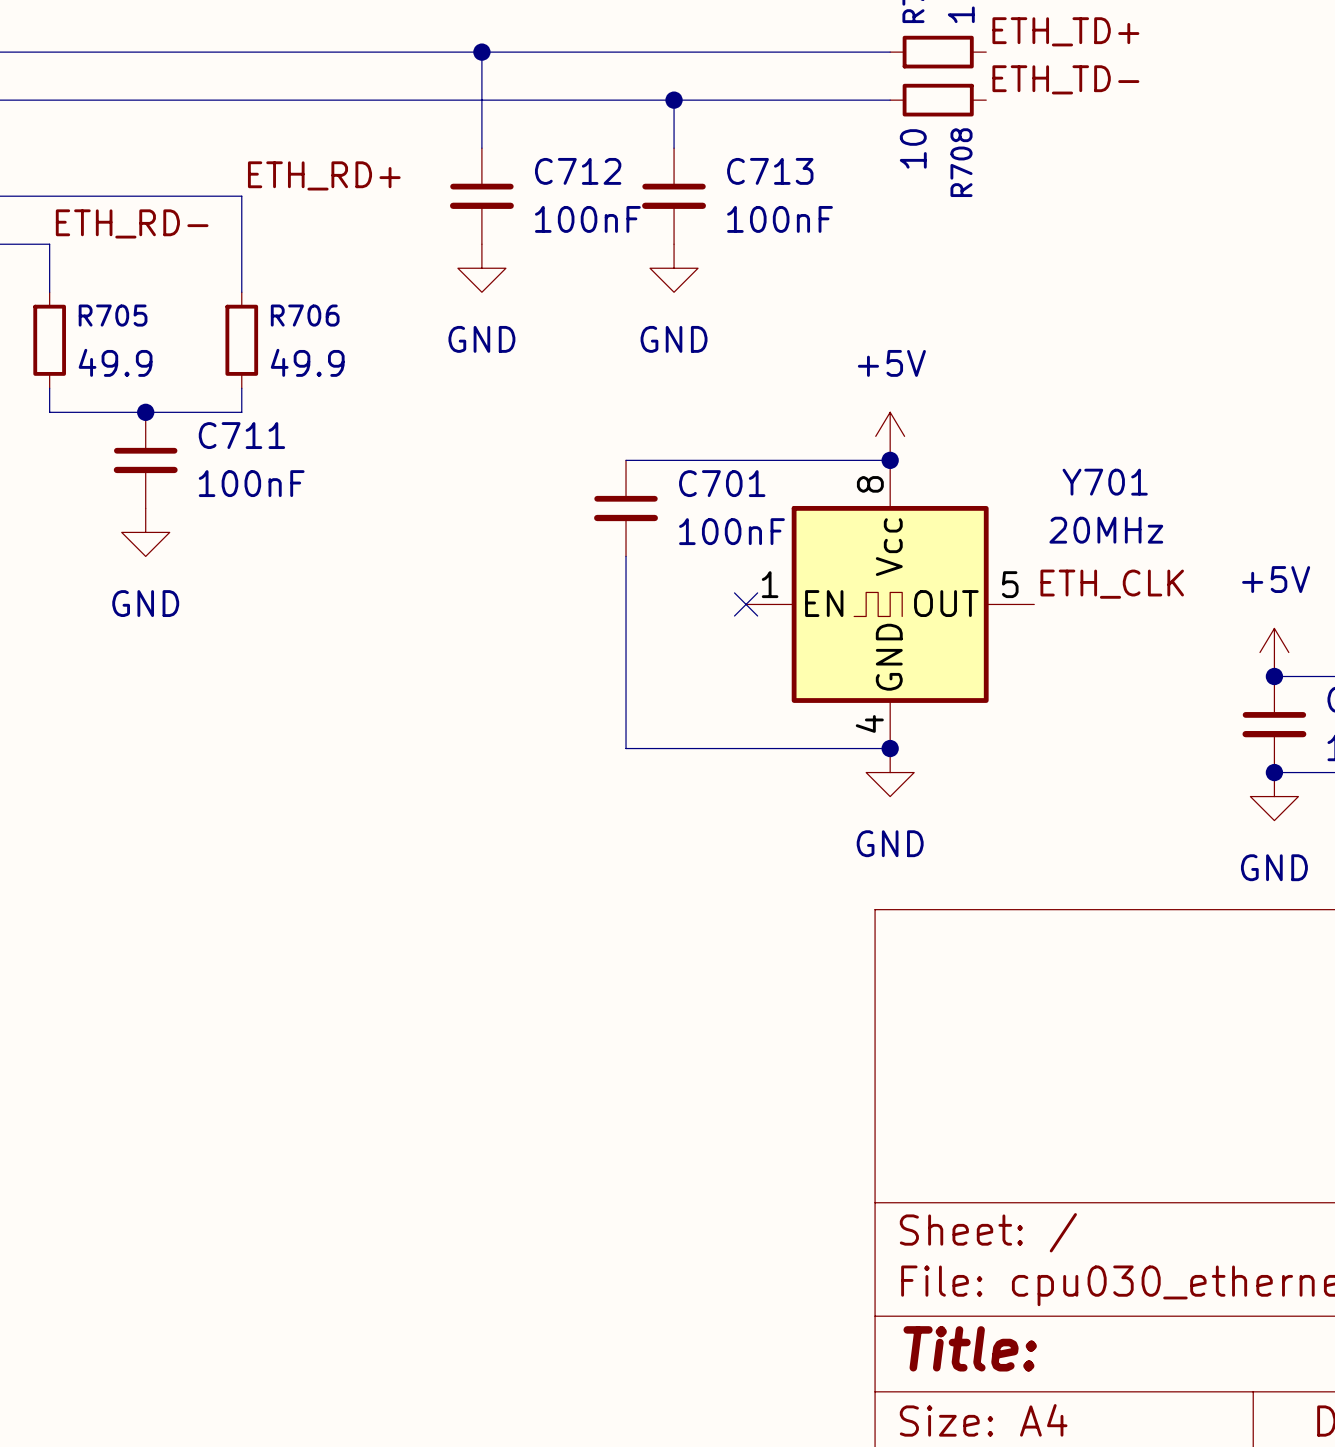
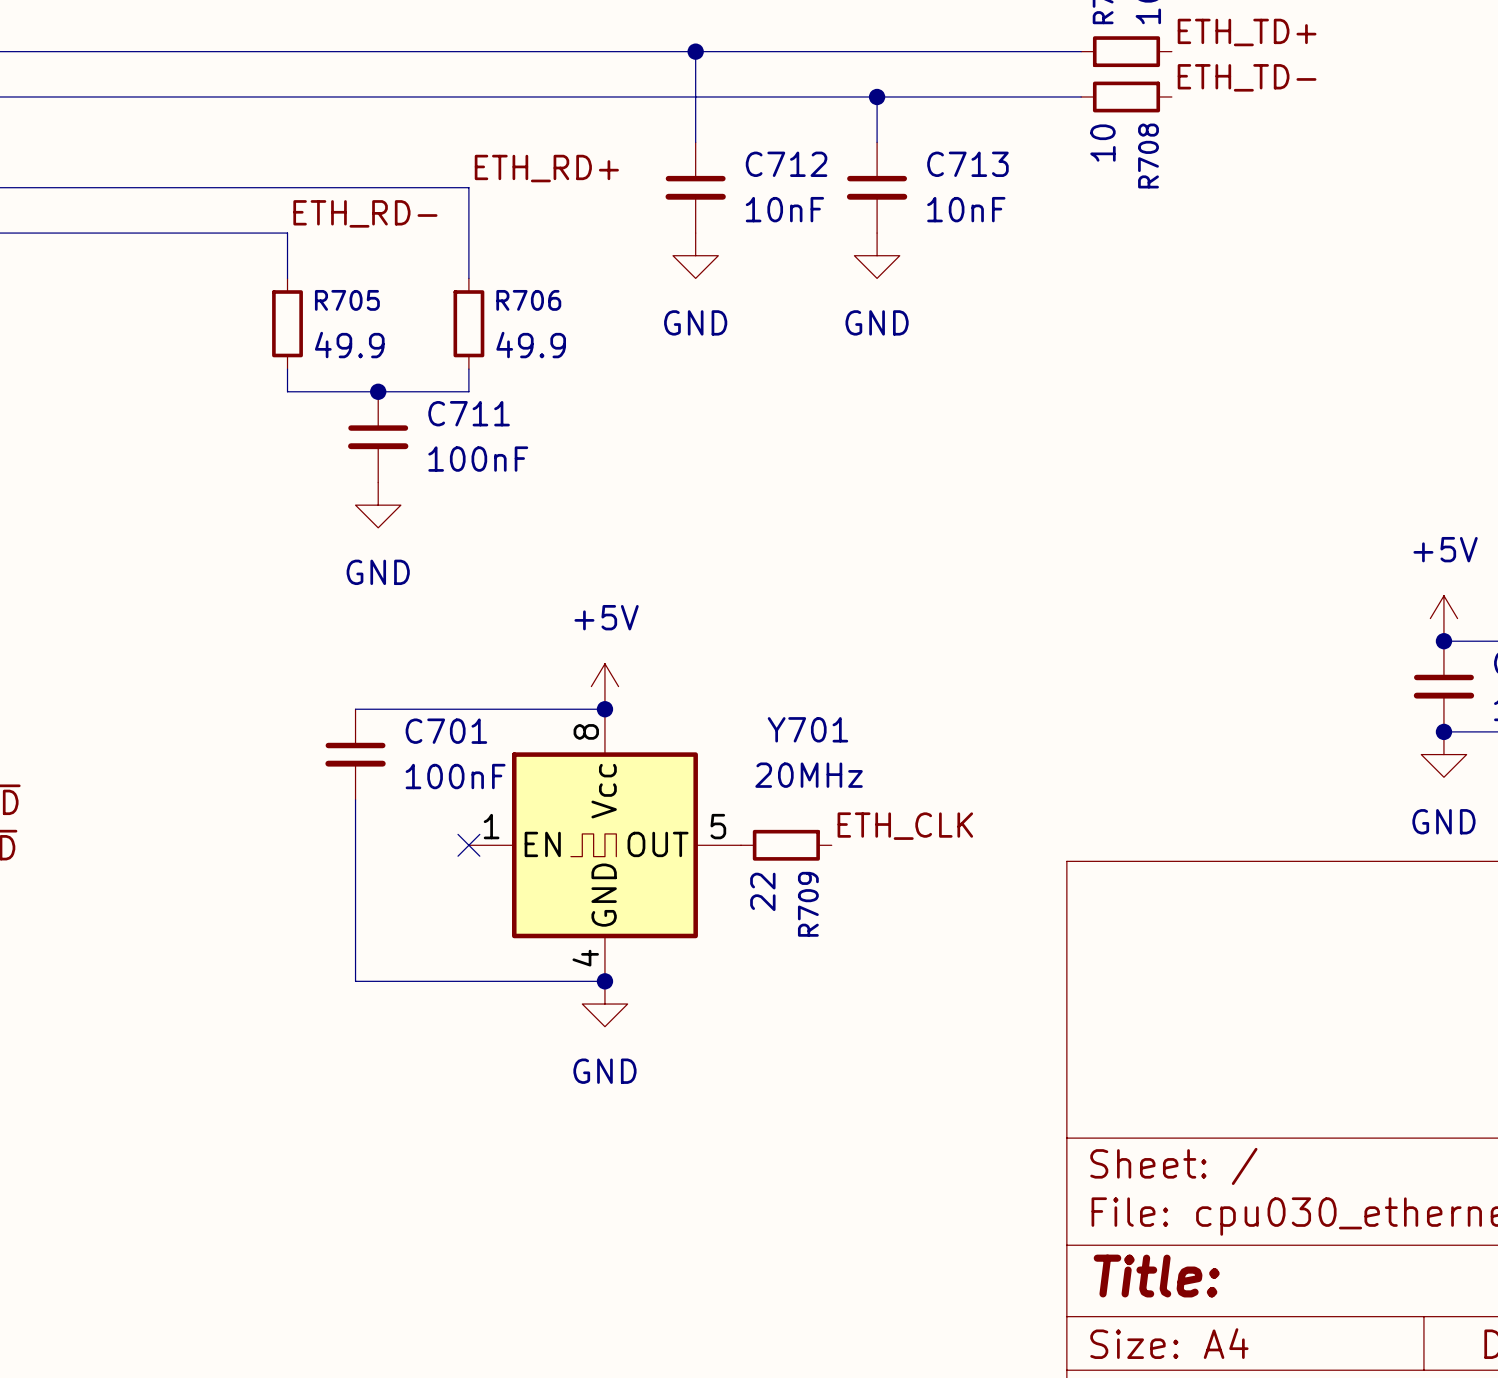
C712 value: 100nF (587, 219) -> 10nF (784, 209)
C713 value: 100nF (780, 219) -> 10nF (966, 209)
power symbol: +5V (890, 436) -> none
wire: (626, 460) (890, 460) -> none
junction: (890, 460) -> none
C701 position: (626, 508) -> (355, 754)
wire: (626, 556) (626, 748) (890, 748) -> none
label: ETH_CLK (1112, 584) -> none
no-connect mark: (746, 604) -> none
Y701 position: (890, 604) -> (604, 845)
power symbol: none -> +5V (604, 686)
wire: none -> (355, 709) (604, 709)
junction: none -> (604, 709)
junction: (890, 748) -> none
power symbol: GND (890, 772) -> none
wire: none -> (355, 799) (355, 981) (604, 981)
label: none -> ETH_CLK (905, 826)
no-connect mark: none -> (468, 845)
R709: none -> 22 (786, 845)
junction: none -> (604, 981)
power symbol: none -> GND (604, 1004)

